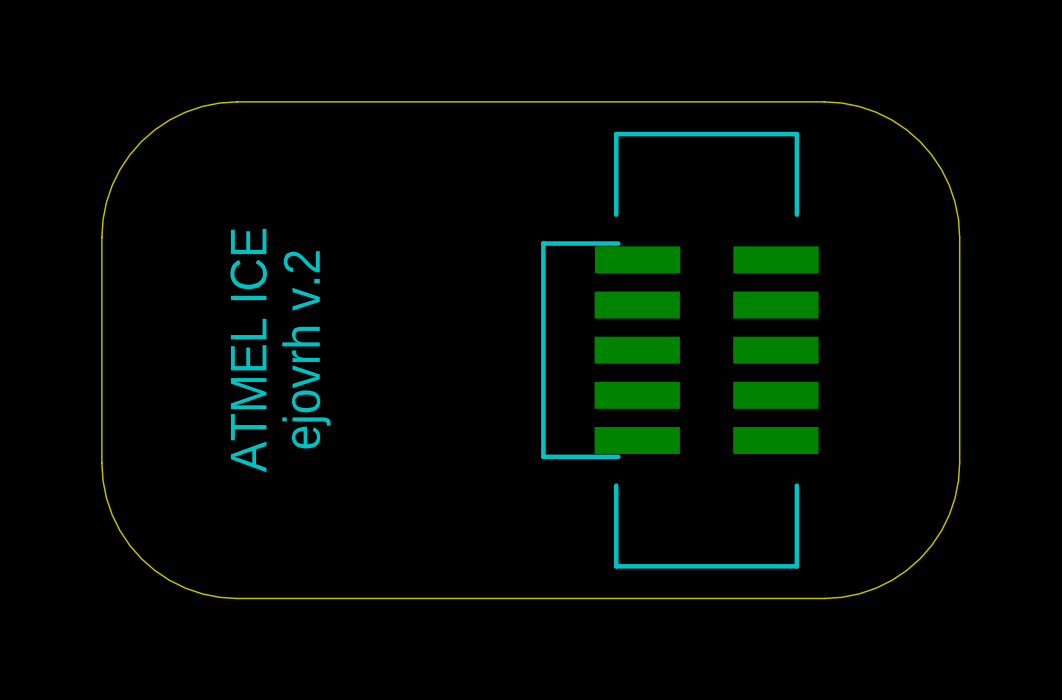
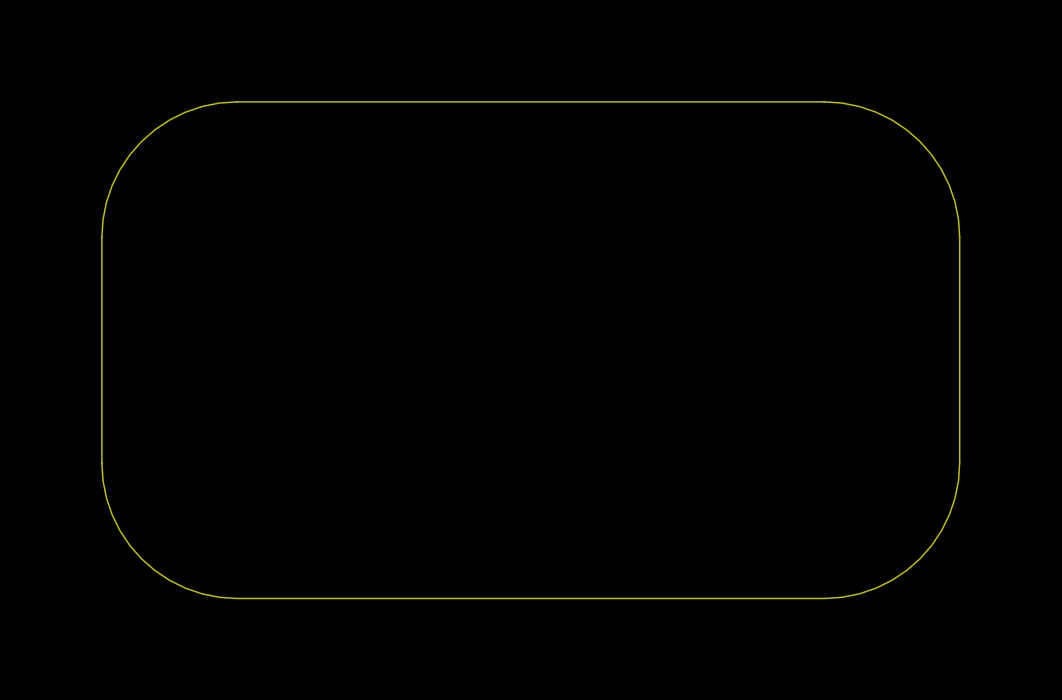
text: ejovrh v.2 (306, 349) -> none
text: ATMEL ICE (248, 350) -> none
part: (679, 350) -> none

